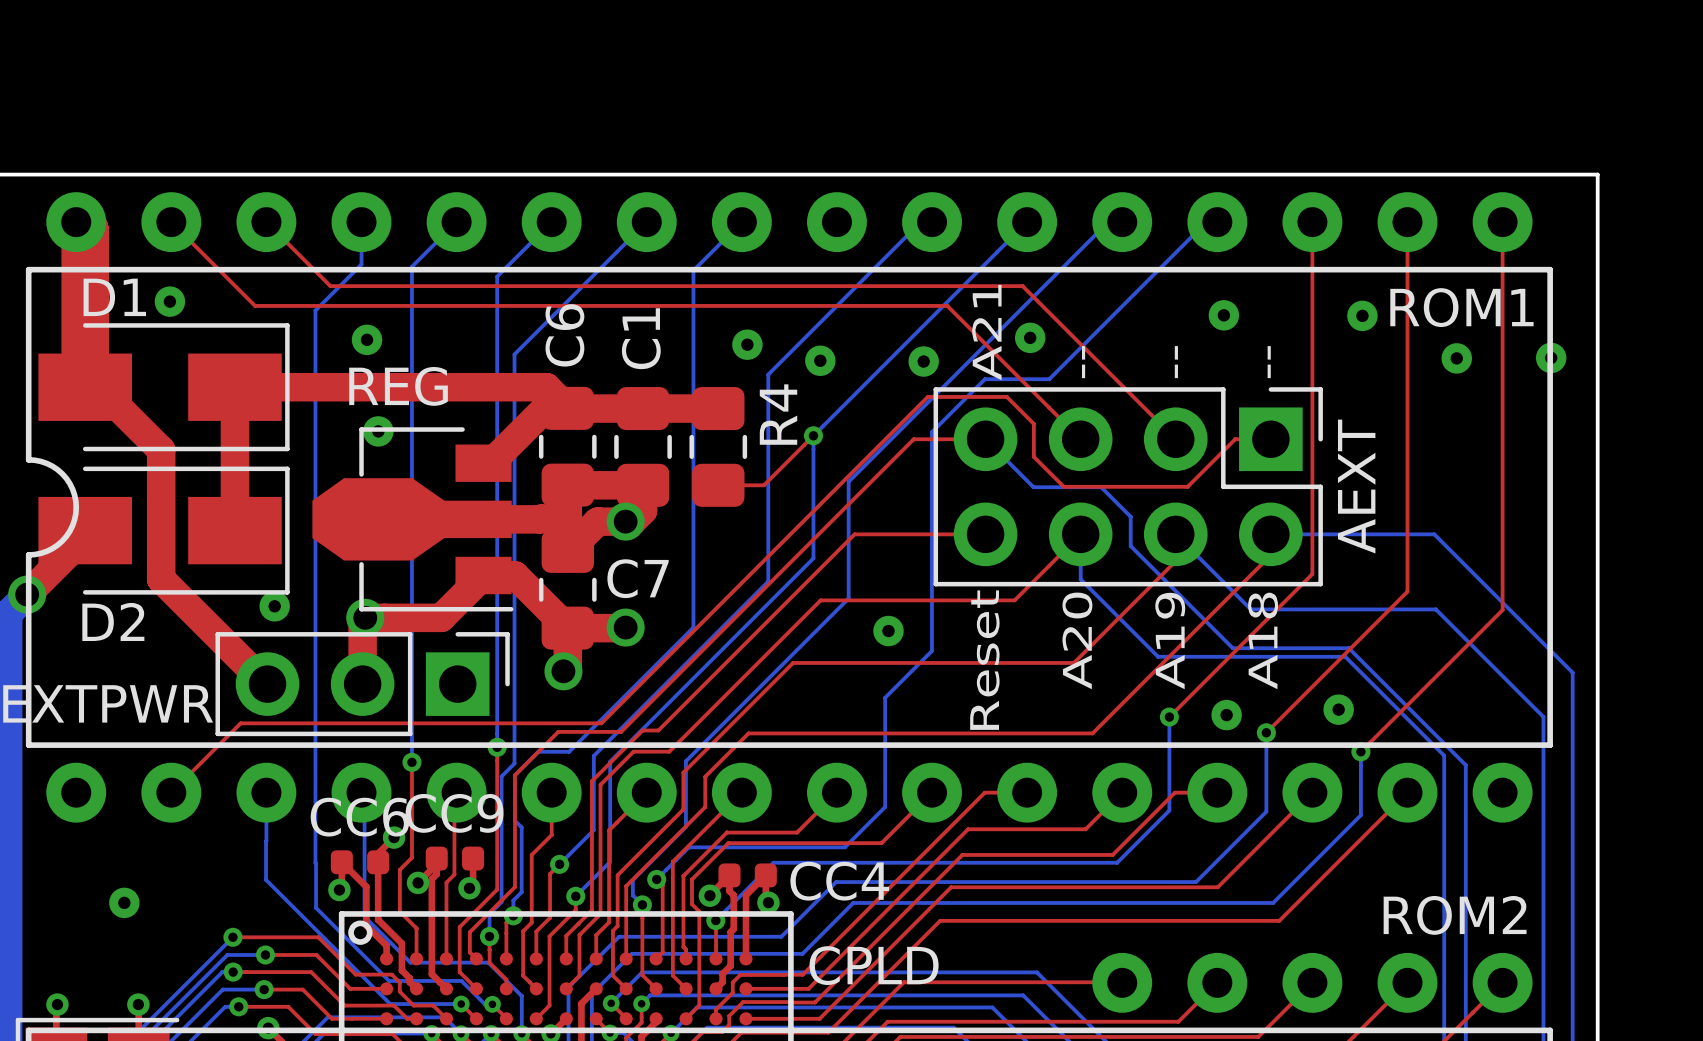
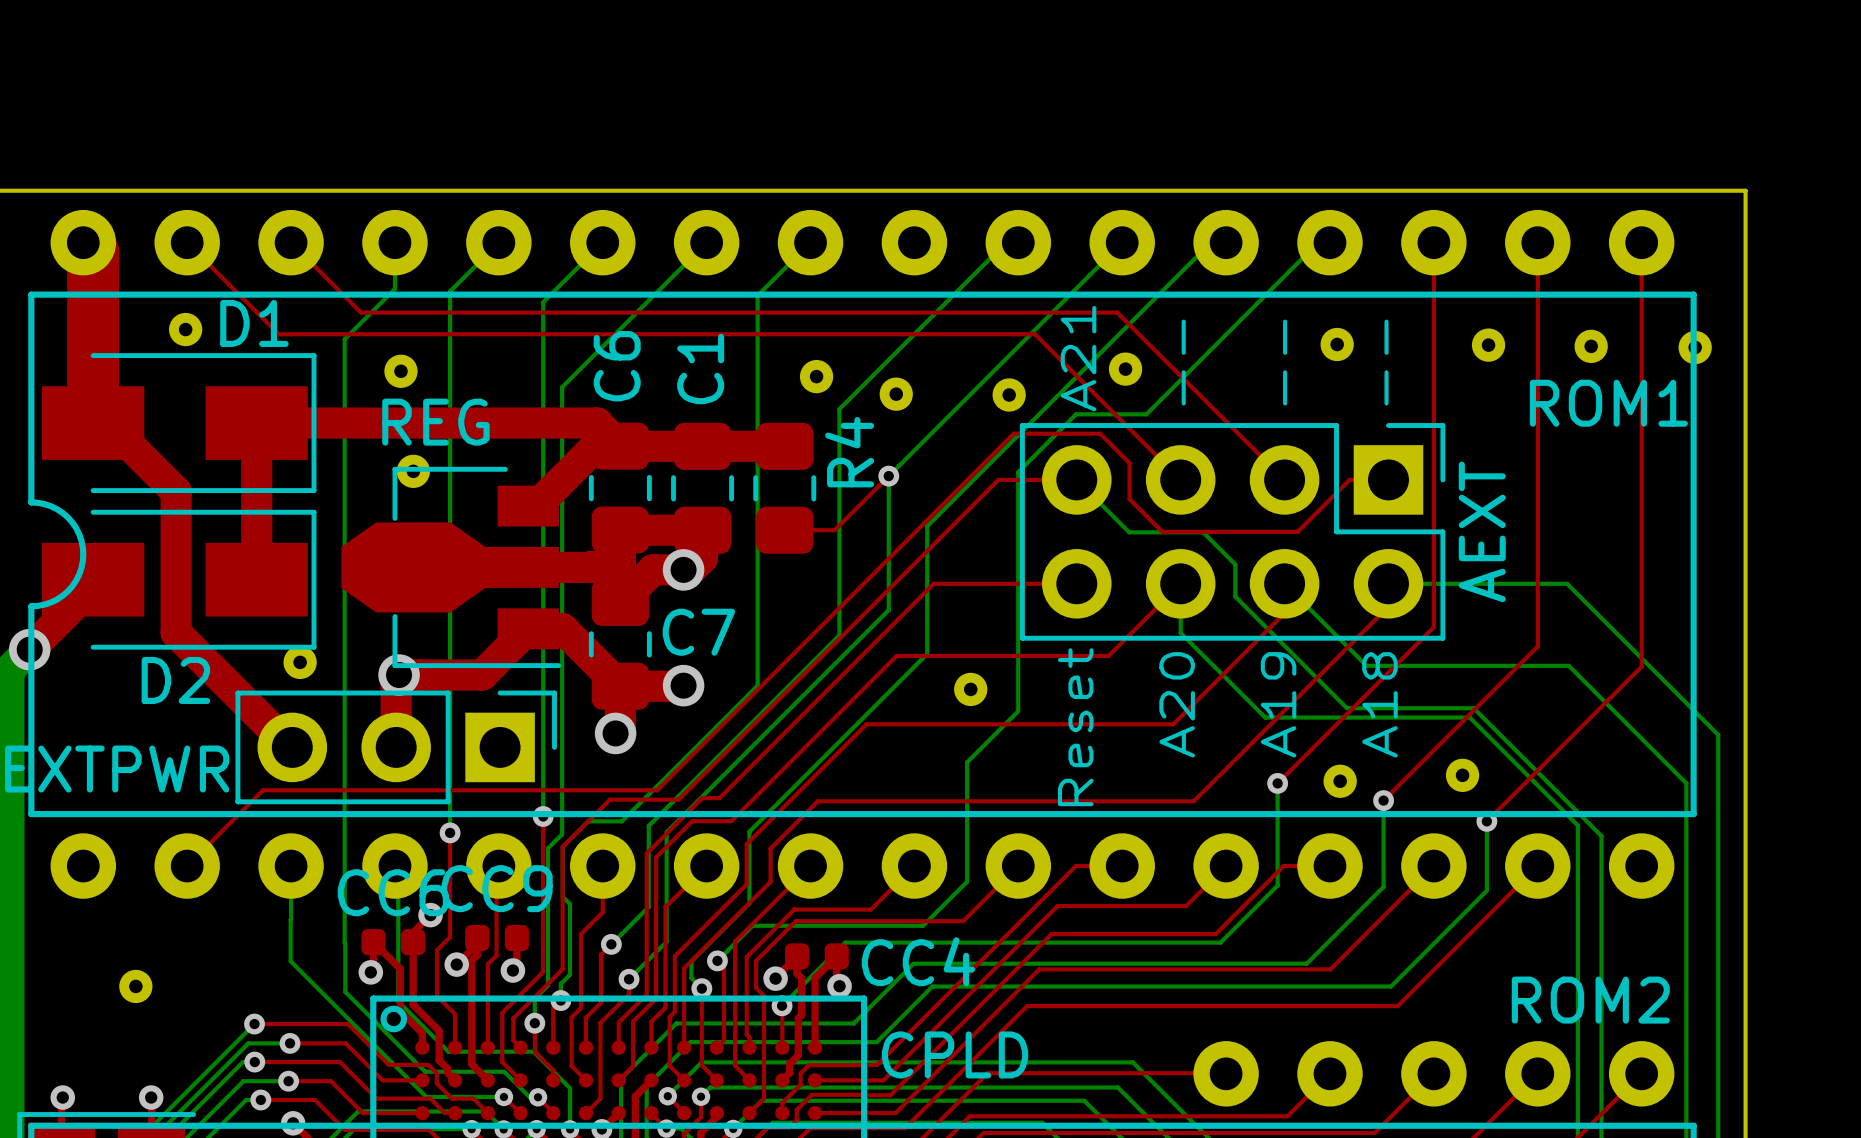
D1 name position: D1 (114, 297) -> D1 (254, 323)
ROM1 name position: ROM1 (1461, 307) -> ROM1 (1608, 403)
part position: (1551, 357) -> (1695, 347)
part position: (1456, 358) -> (1591, 346)
D2 name position: D2 (113, 621) -> D2 (175, 680)

